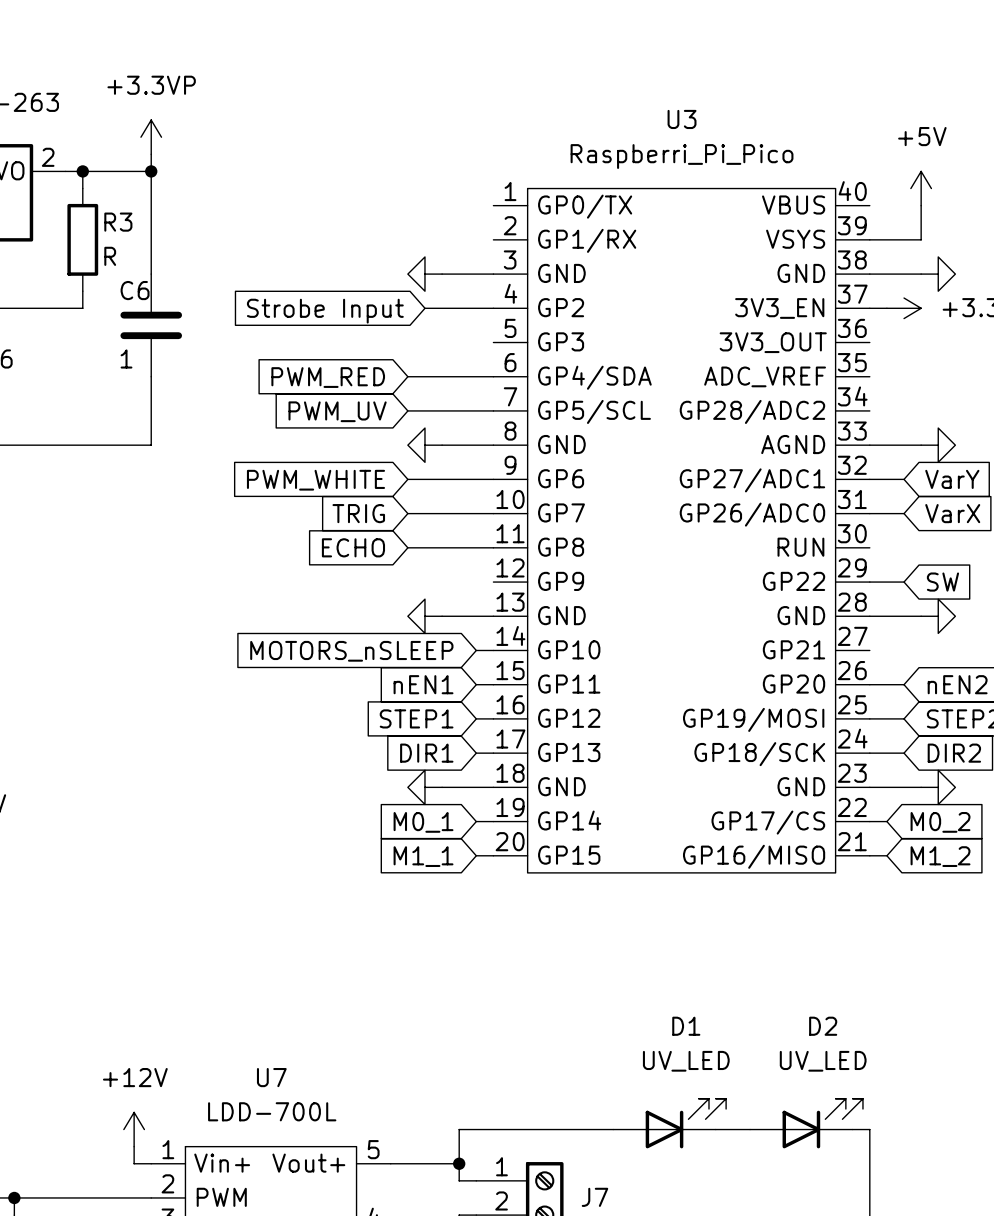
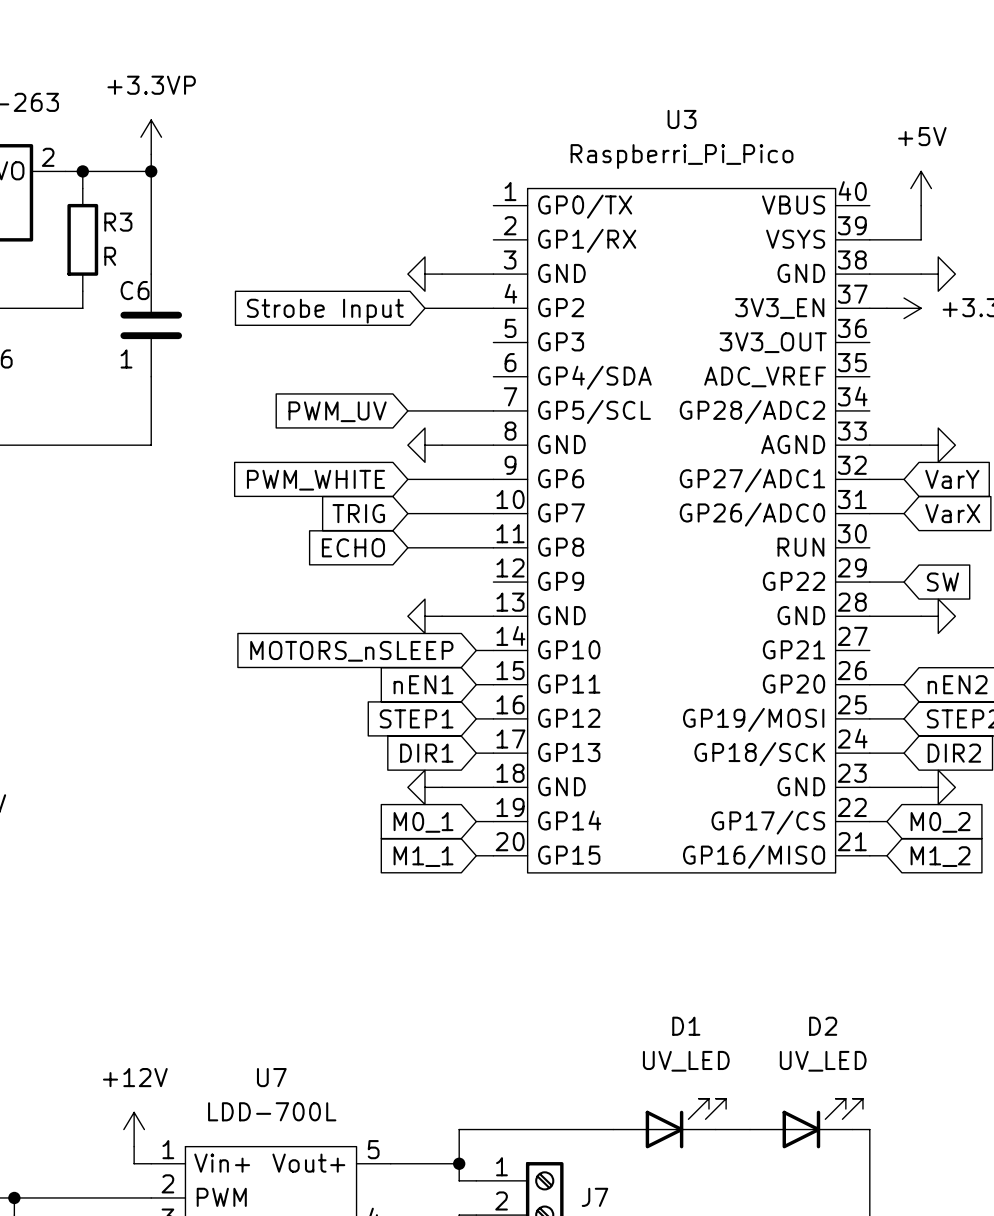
wire: (407, 376) (493, 376) -> none
global label: PWM_RED (328, 377) -> none

